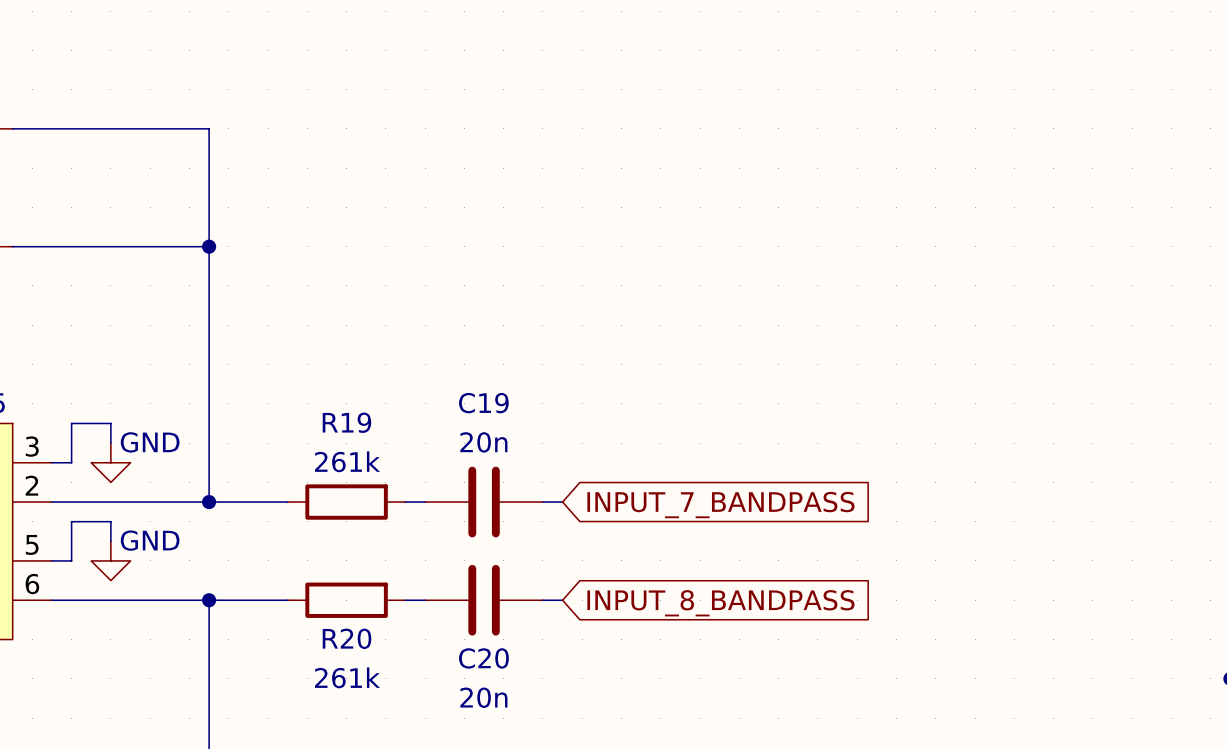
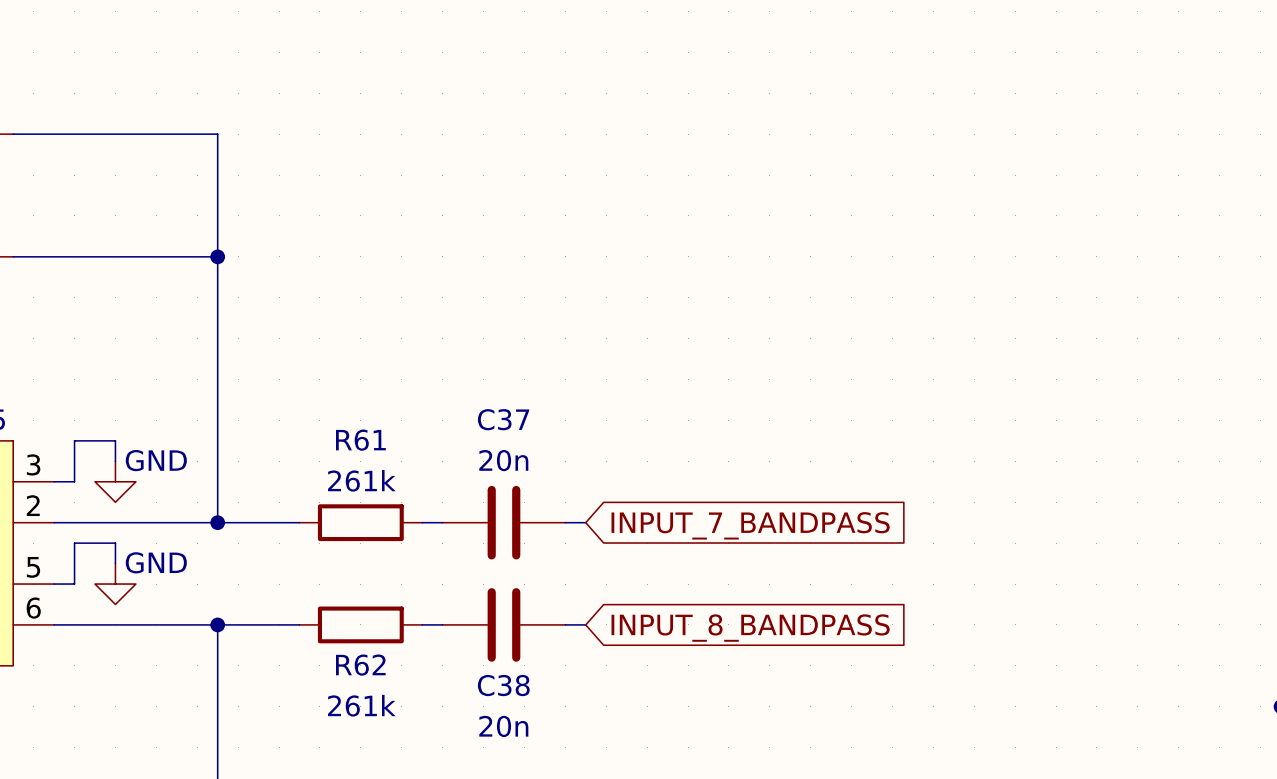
C19 name: C19 (483, 403) -> C37 (503, 419)
R19 name: R19 (346, 422) -> R61 (360, 440)
R20 name: R20 (347, 638) -> R62 (360, 665)
C20 name: C20 (483, 658) -> C38 (503, 685)

